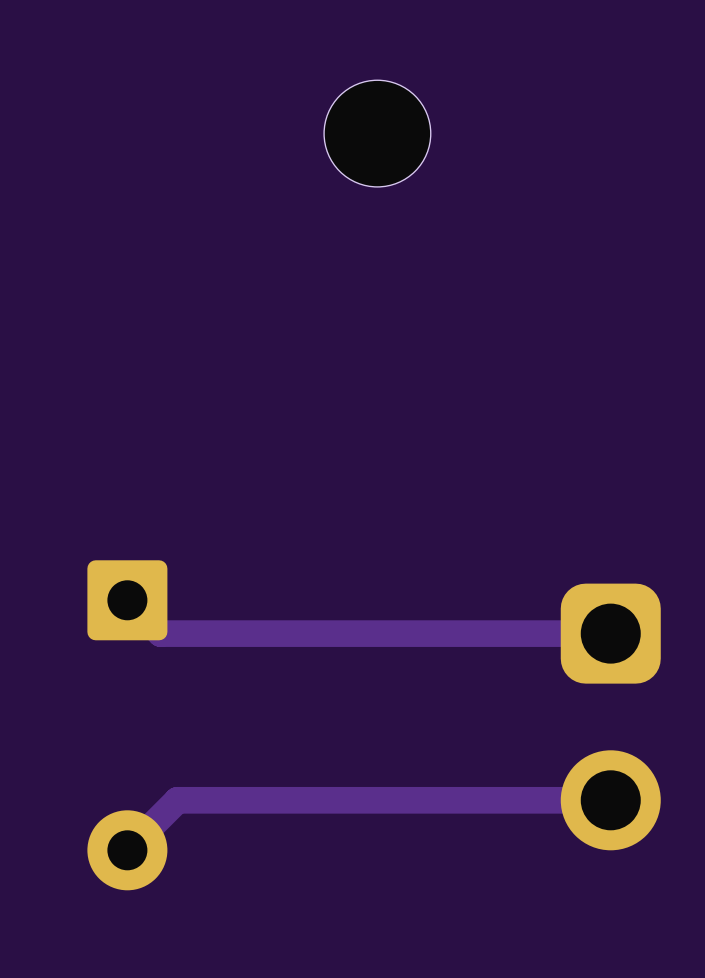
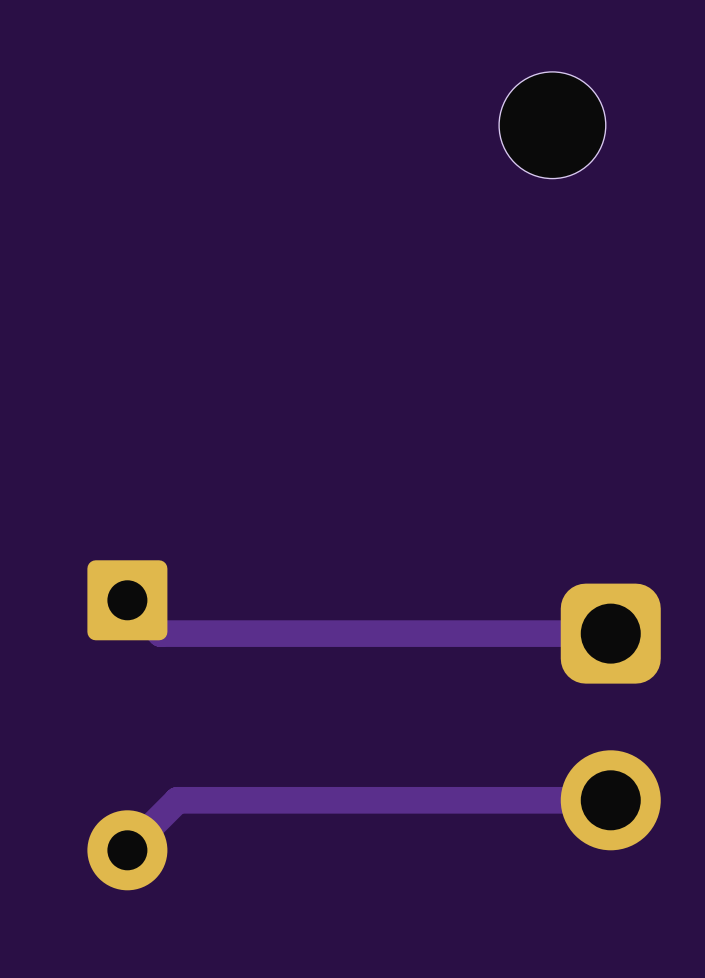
part position: (377, 133) -> (552, 125)

